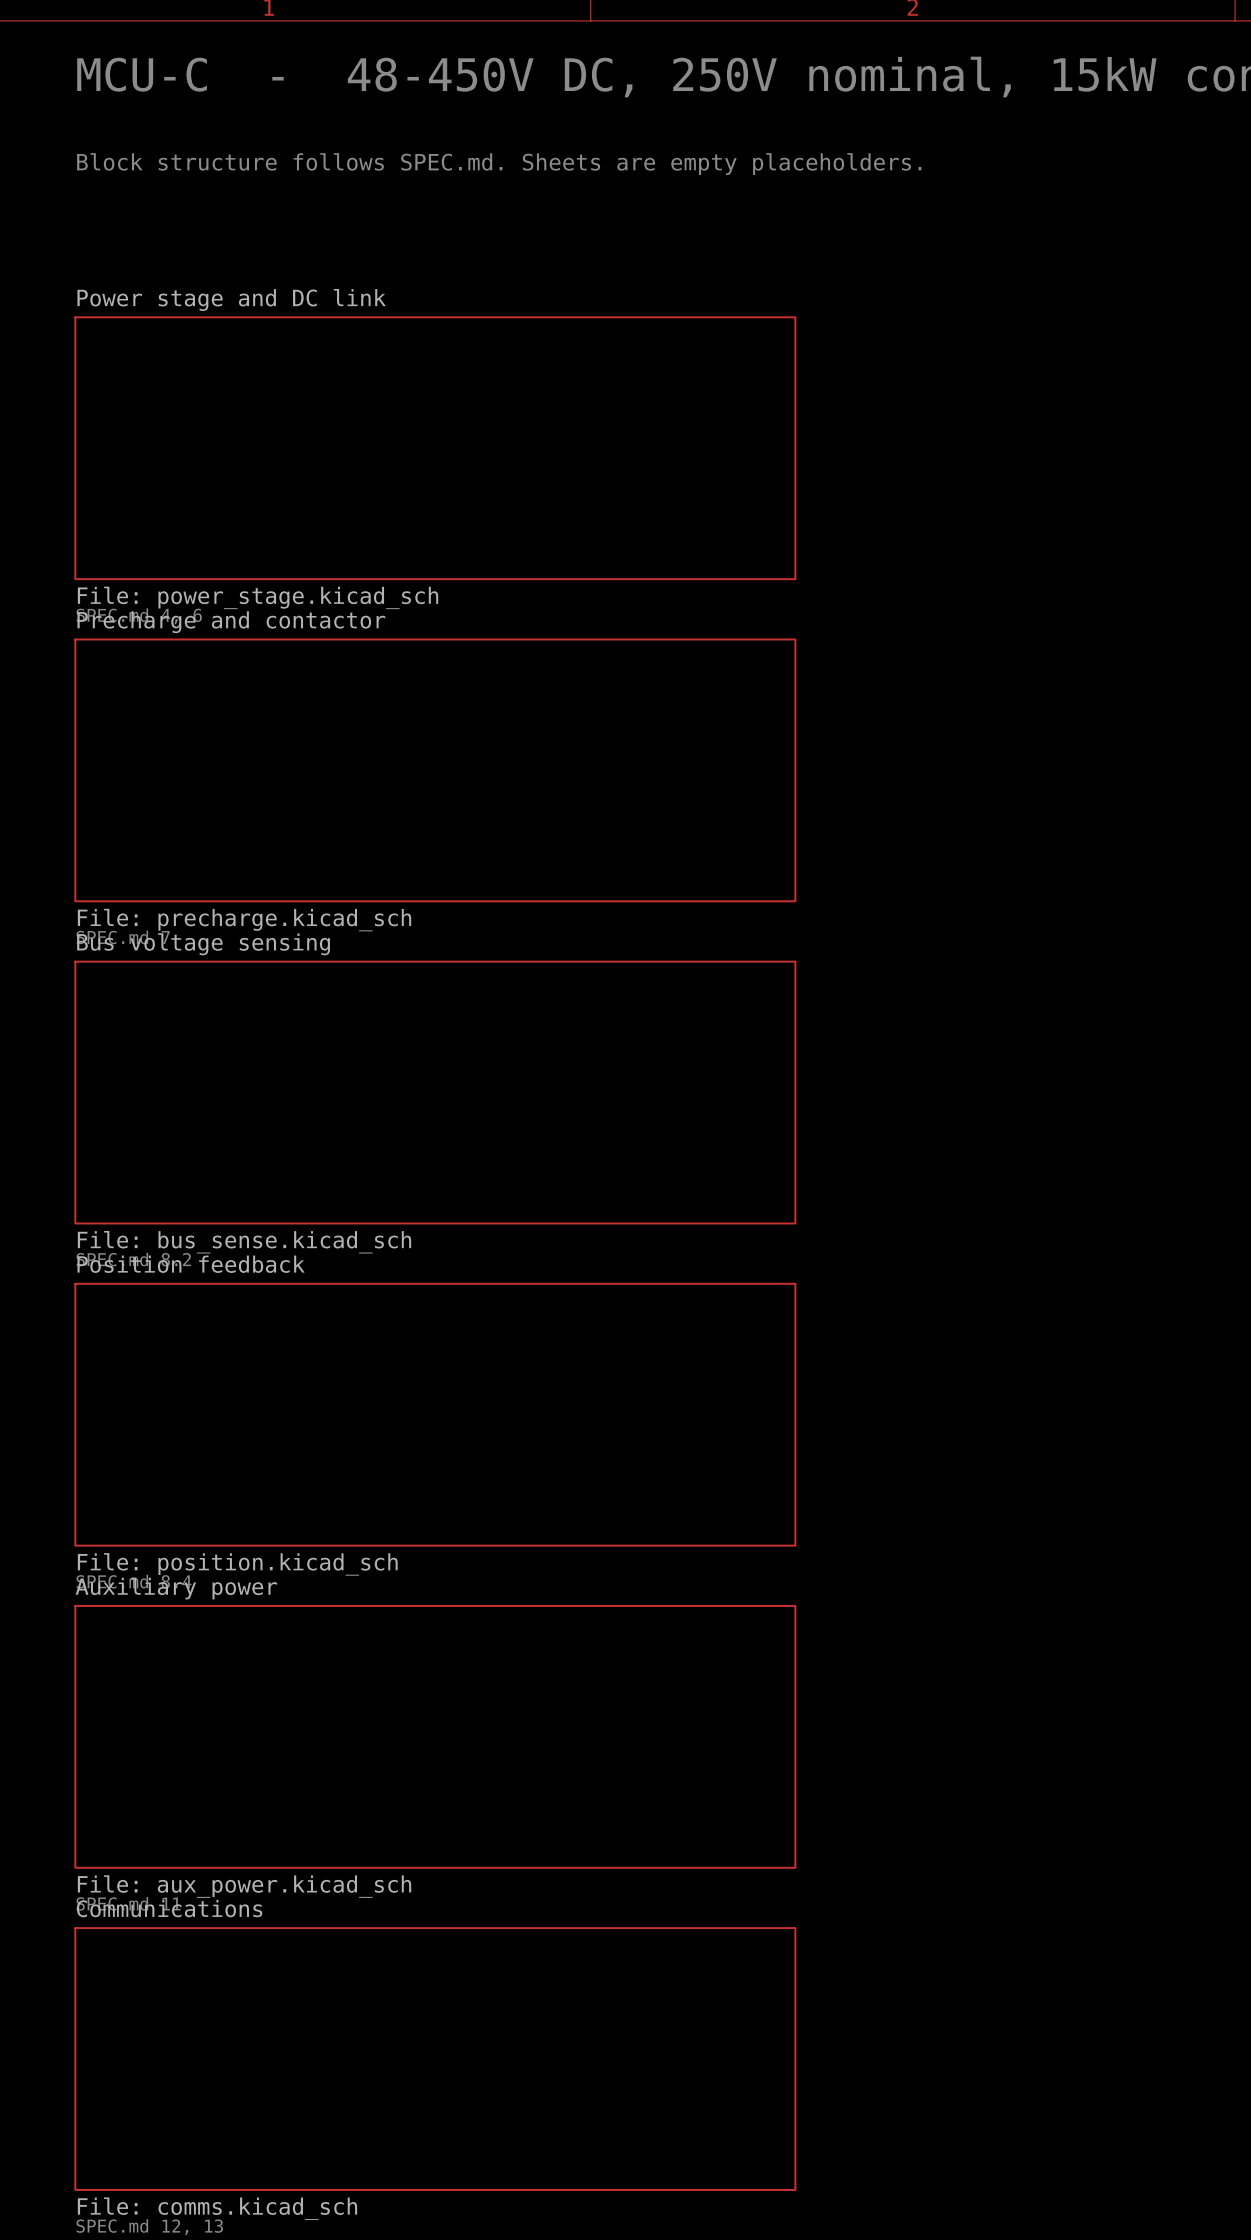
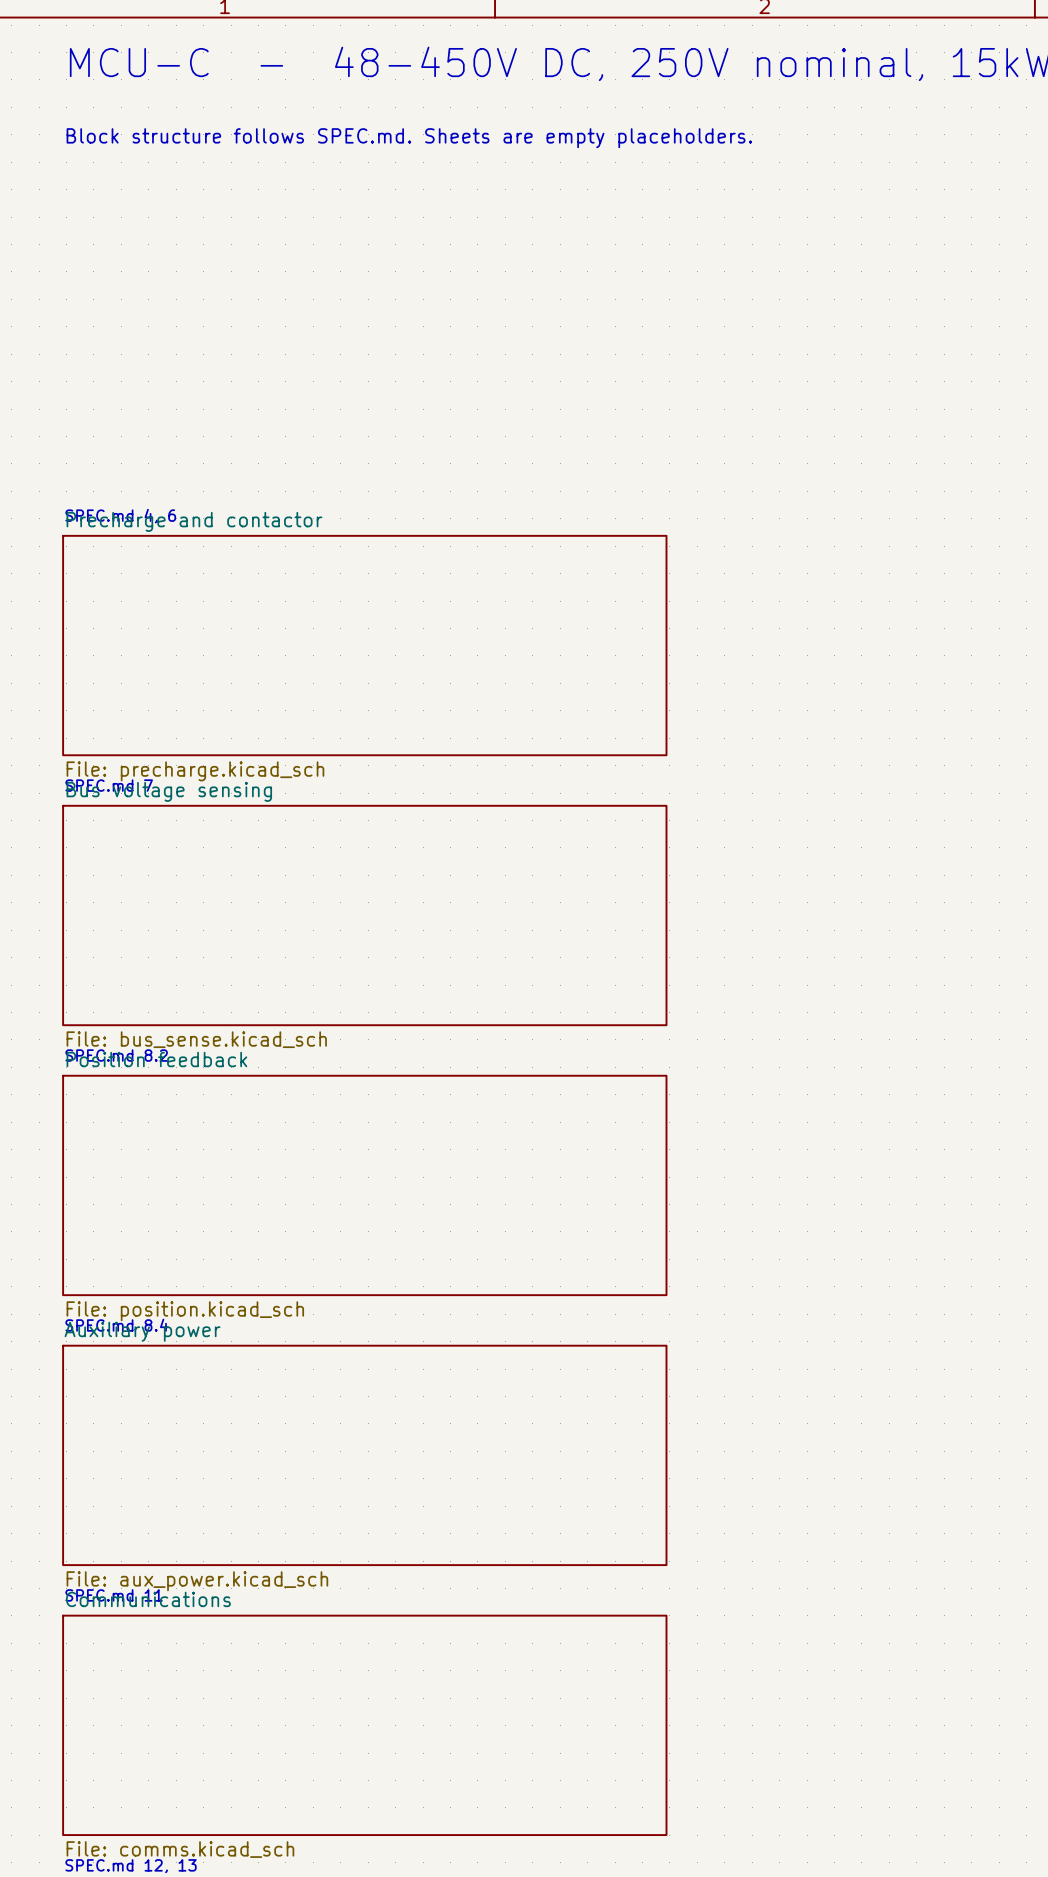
sheet Power stage and DC link: File: power_stage.kicad_sch (435, 448) -> none

